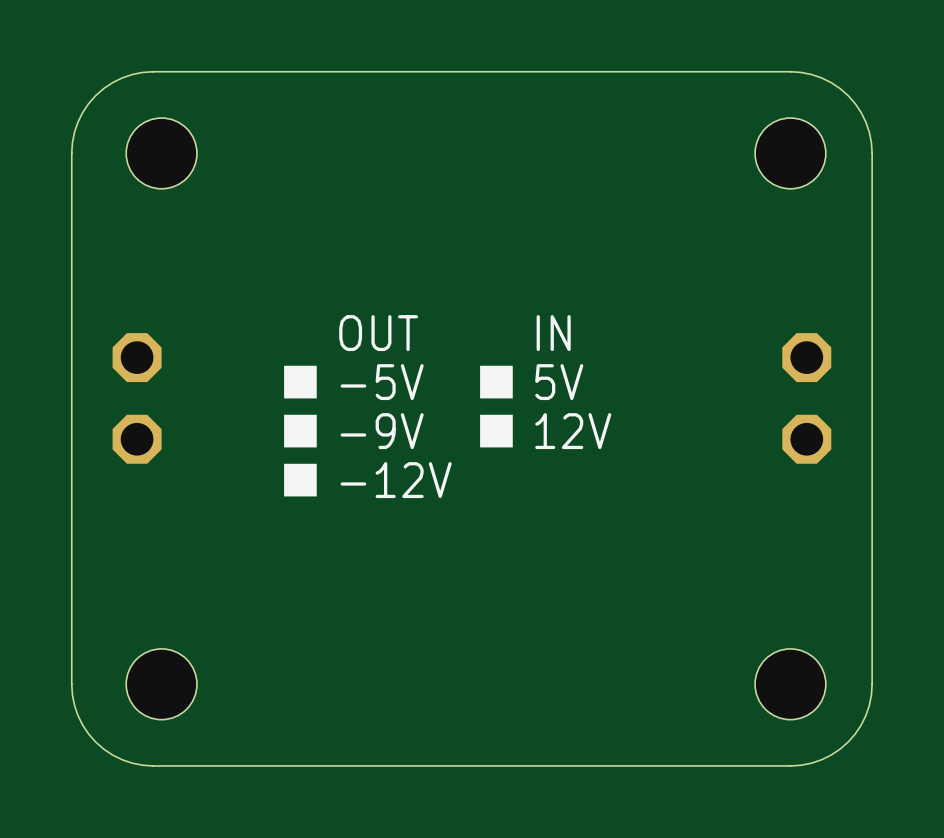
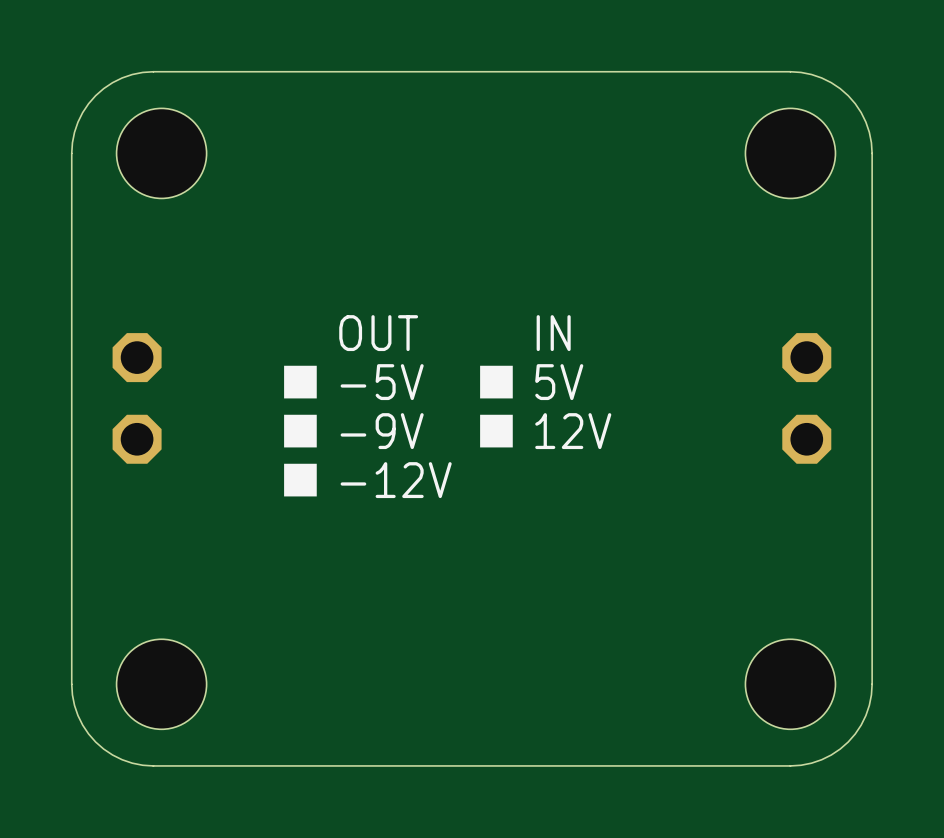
hole size: [126, 118, 197, 189] -> [116, 108, 207, 199]
hole size: [755, 118, 826, 189] -> [745, 108, 836, 199]
hole size: [126, 648, 197, 720] -> [116, 639, 207, 730]
hole size: [755, 648, 826, 720] -> [745, 639, 836, 730]

